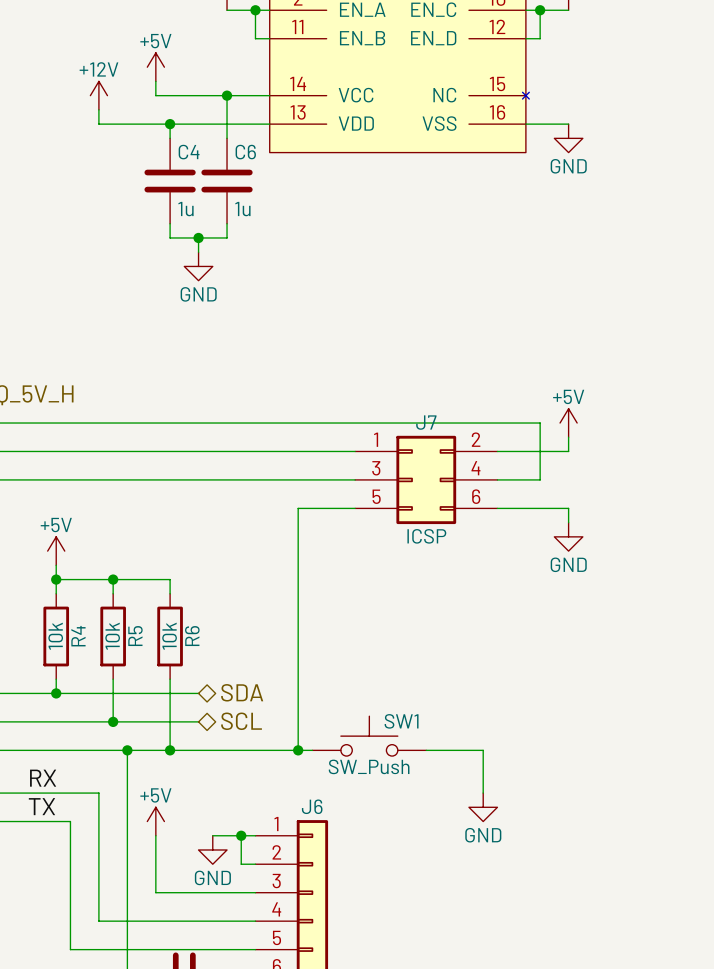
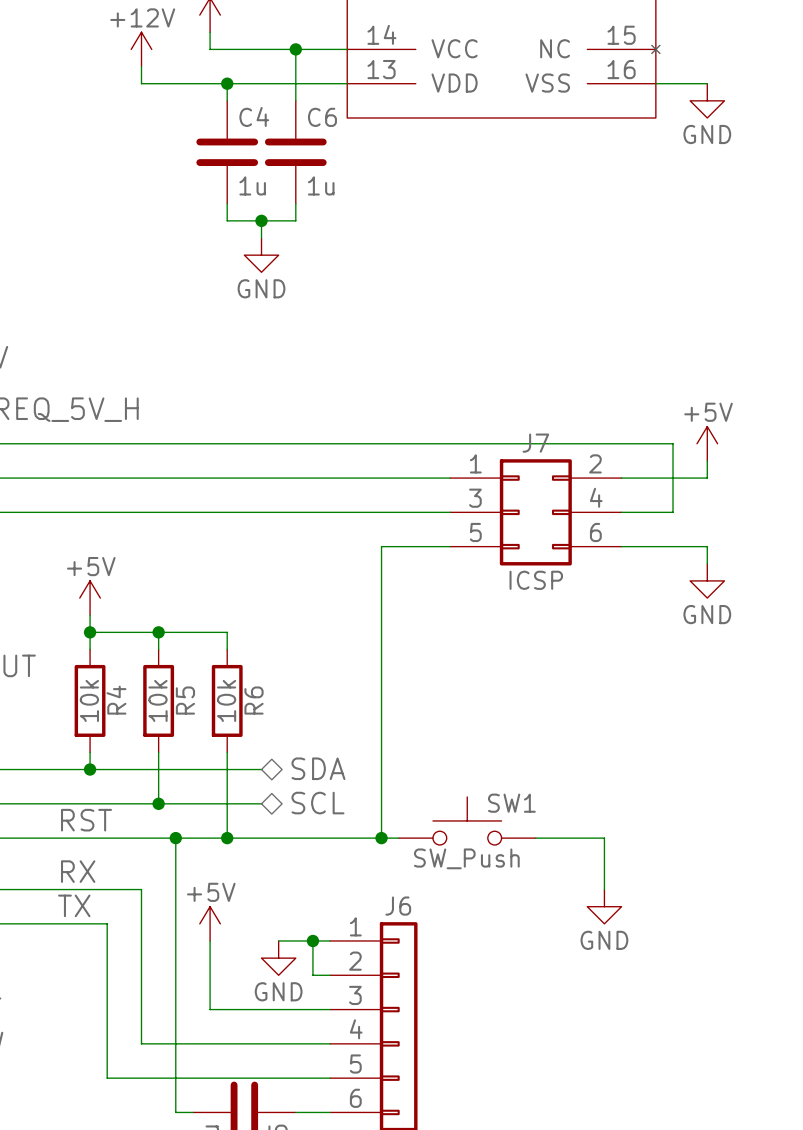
label: none -> RST (86, 820)

